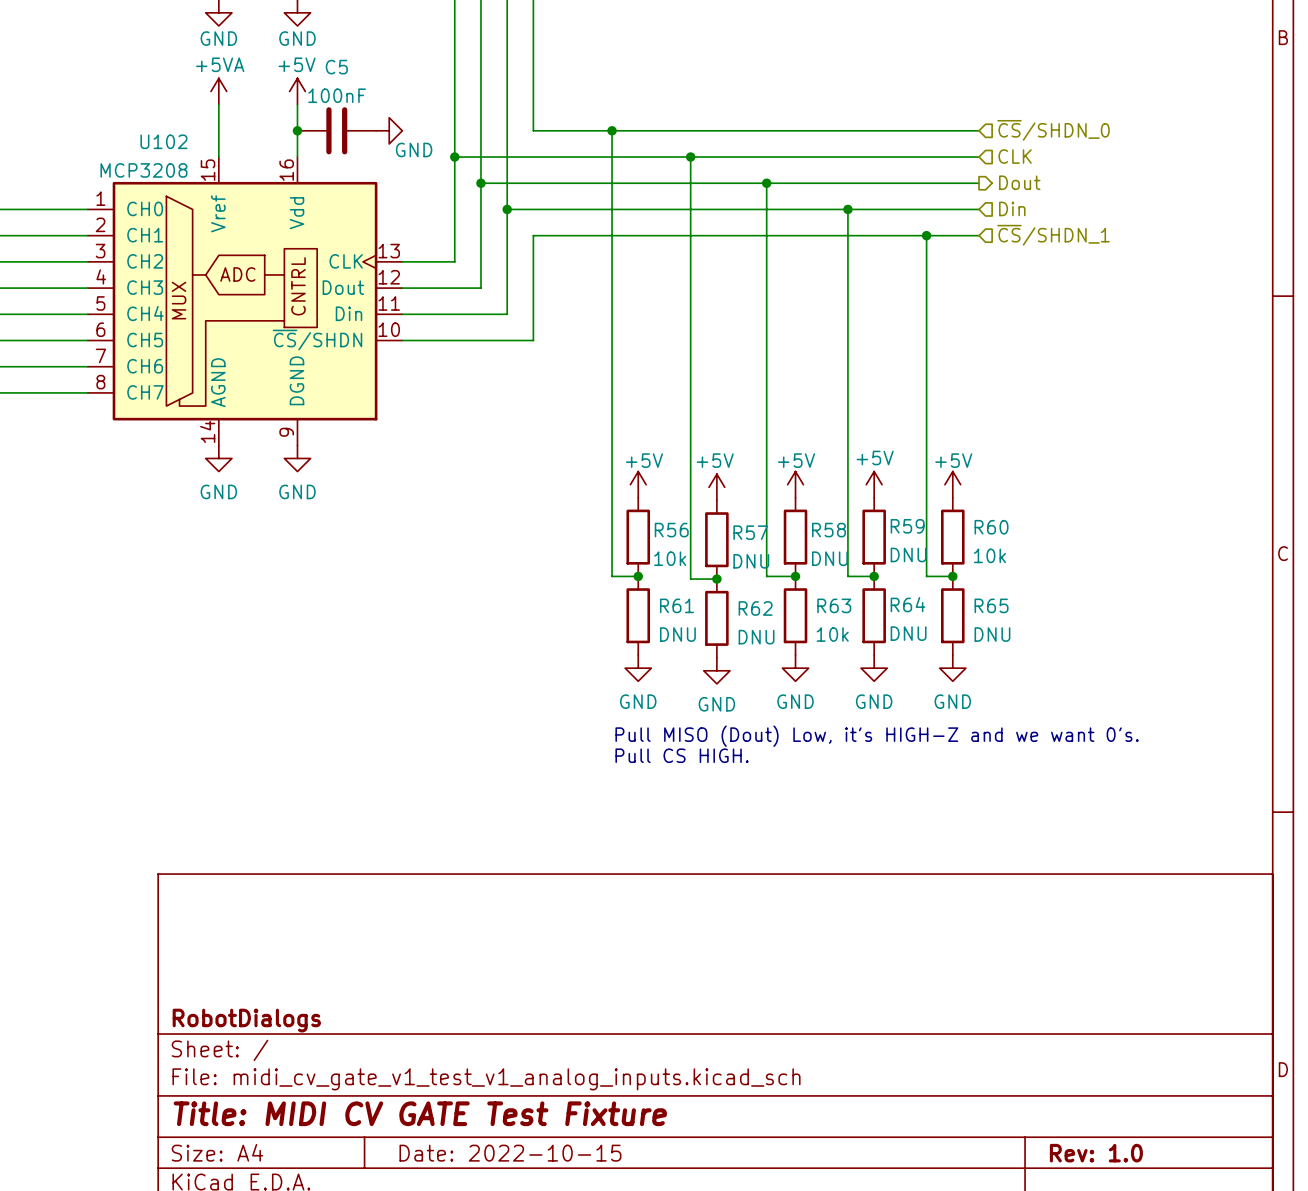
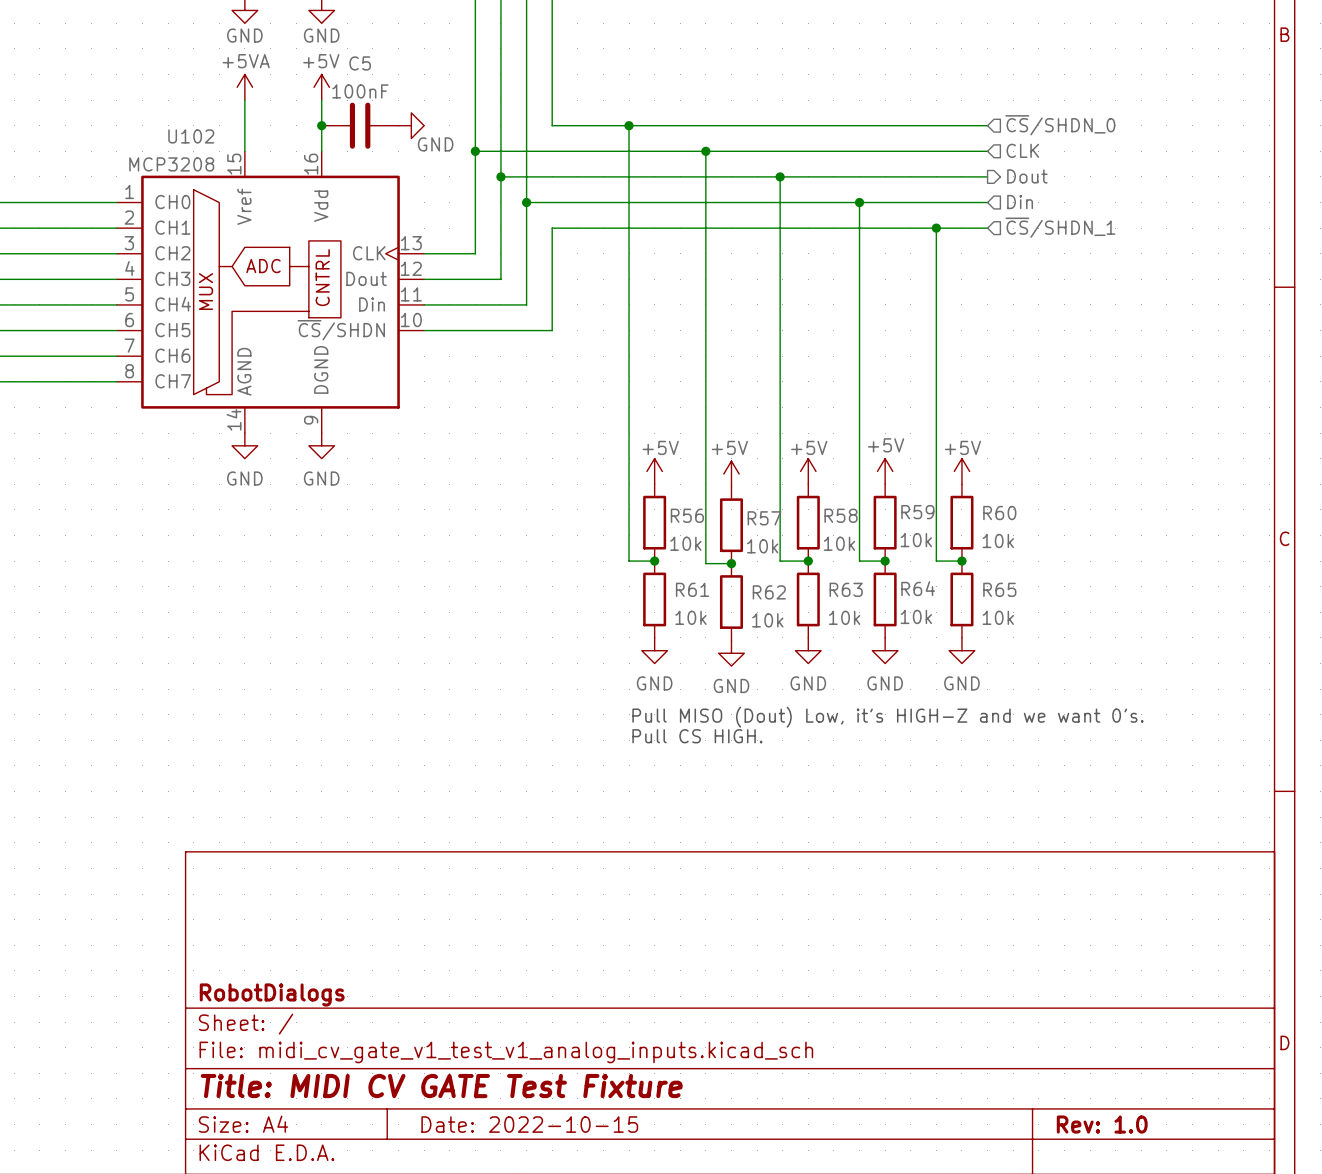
R59 value: DNU (908, 554) -> 10k (916, 540)
R58 value: DNU (829, 558) -> 10k (839, 543)
R57 value: DNU (751, 561) -> 10k (762, 546)
R64 value: DNU (908, 633) -> 10k (916, 616)
R61 value: DNU (677, 634) -> 10k (690, 617)
R65 value: DNU (992, 634) -> 10k (998, 617)
R62 value: DNU (756, 637) -> 10k (767, 620)

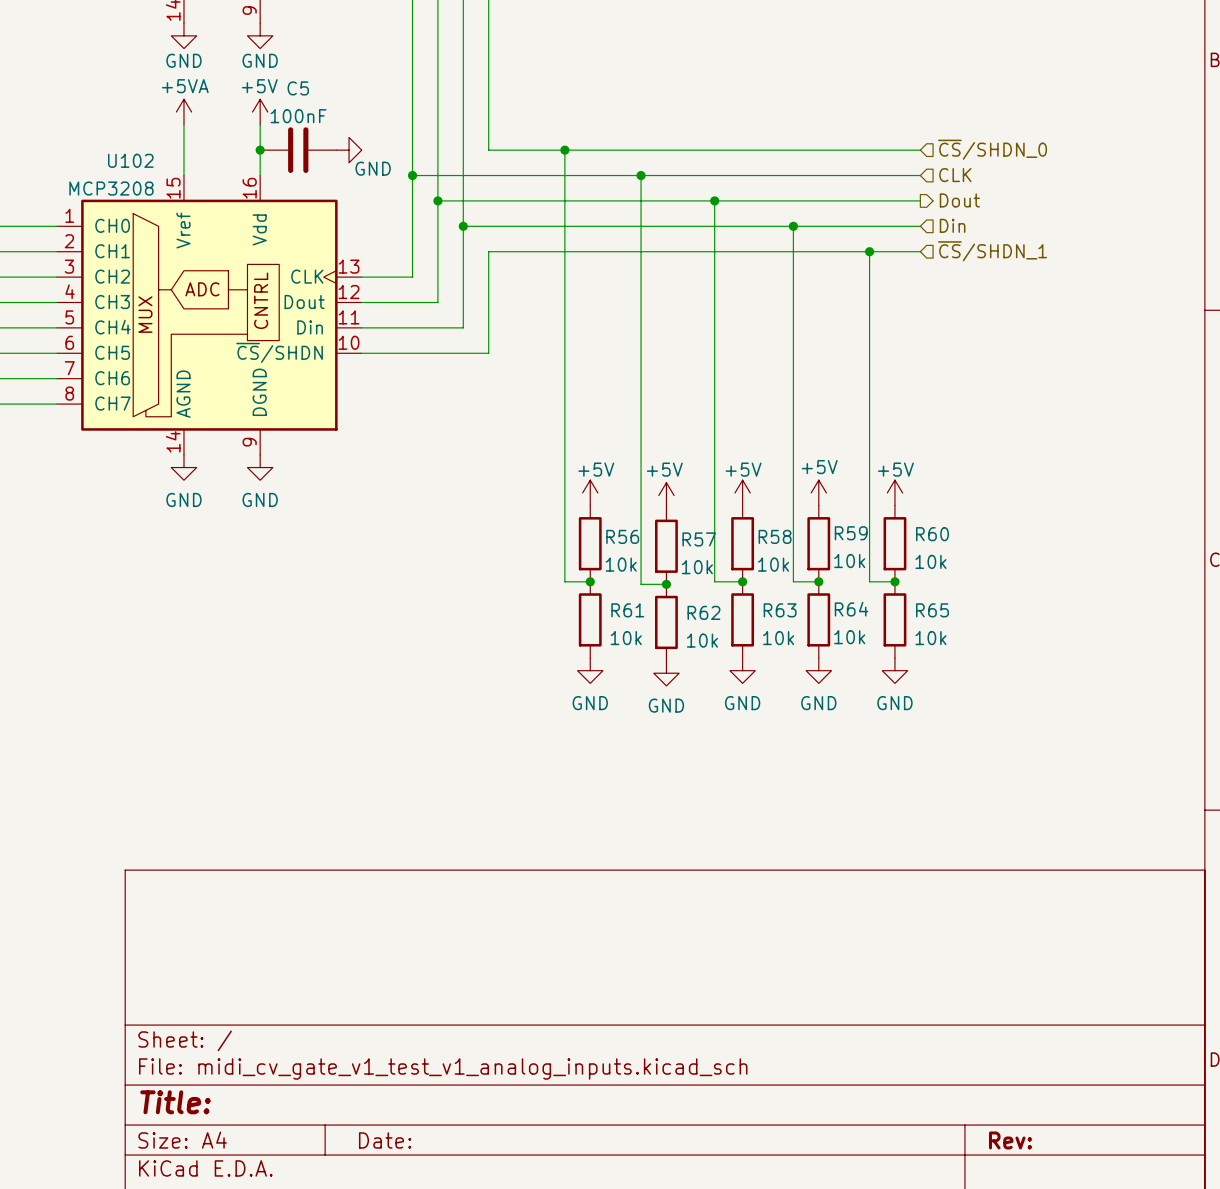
text: Pull MISO (Dout) Low, it's HIGH-Z and we want 0's. (887, 717) -> none
text: Pull CS HIGH. (697, 736) -> none
title block: RobotDialogs (272, 994) -> none
title block: Title: MIDI CV GATE Test Fixture (441, 1086) -> Title: (175, 1102)
title block: Date: 2022-10-15 (529, 1124) -> Date: (385, 1140)
title block: Rev: 1.0 (1102, 1124) -> Rev: (1010, 1140)

